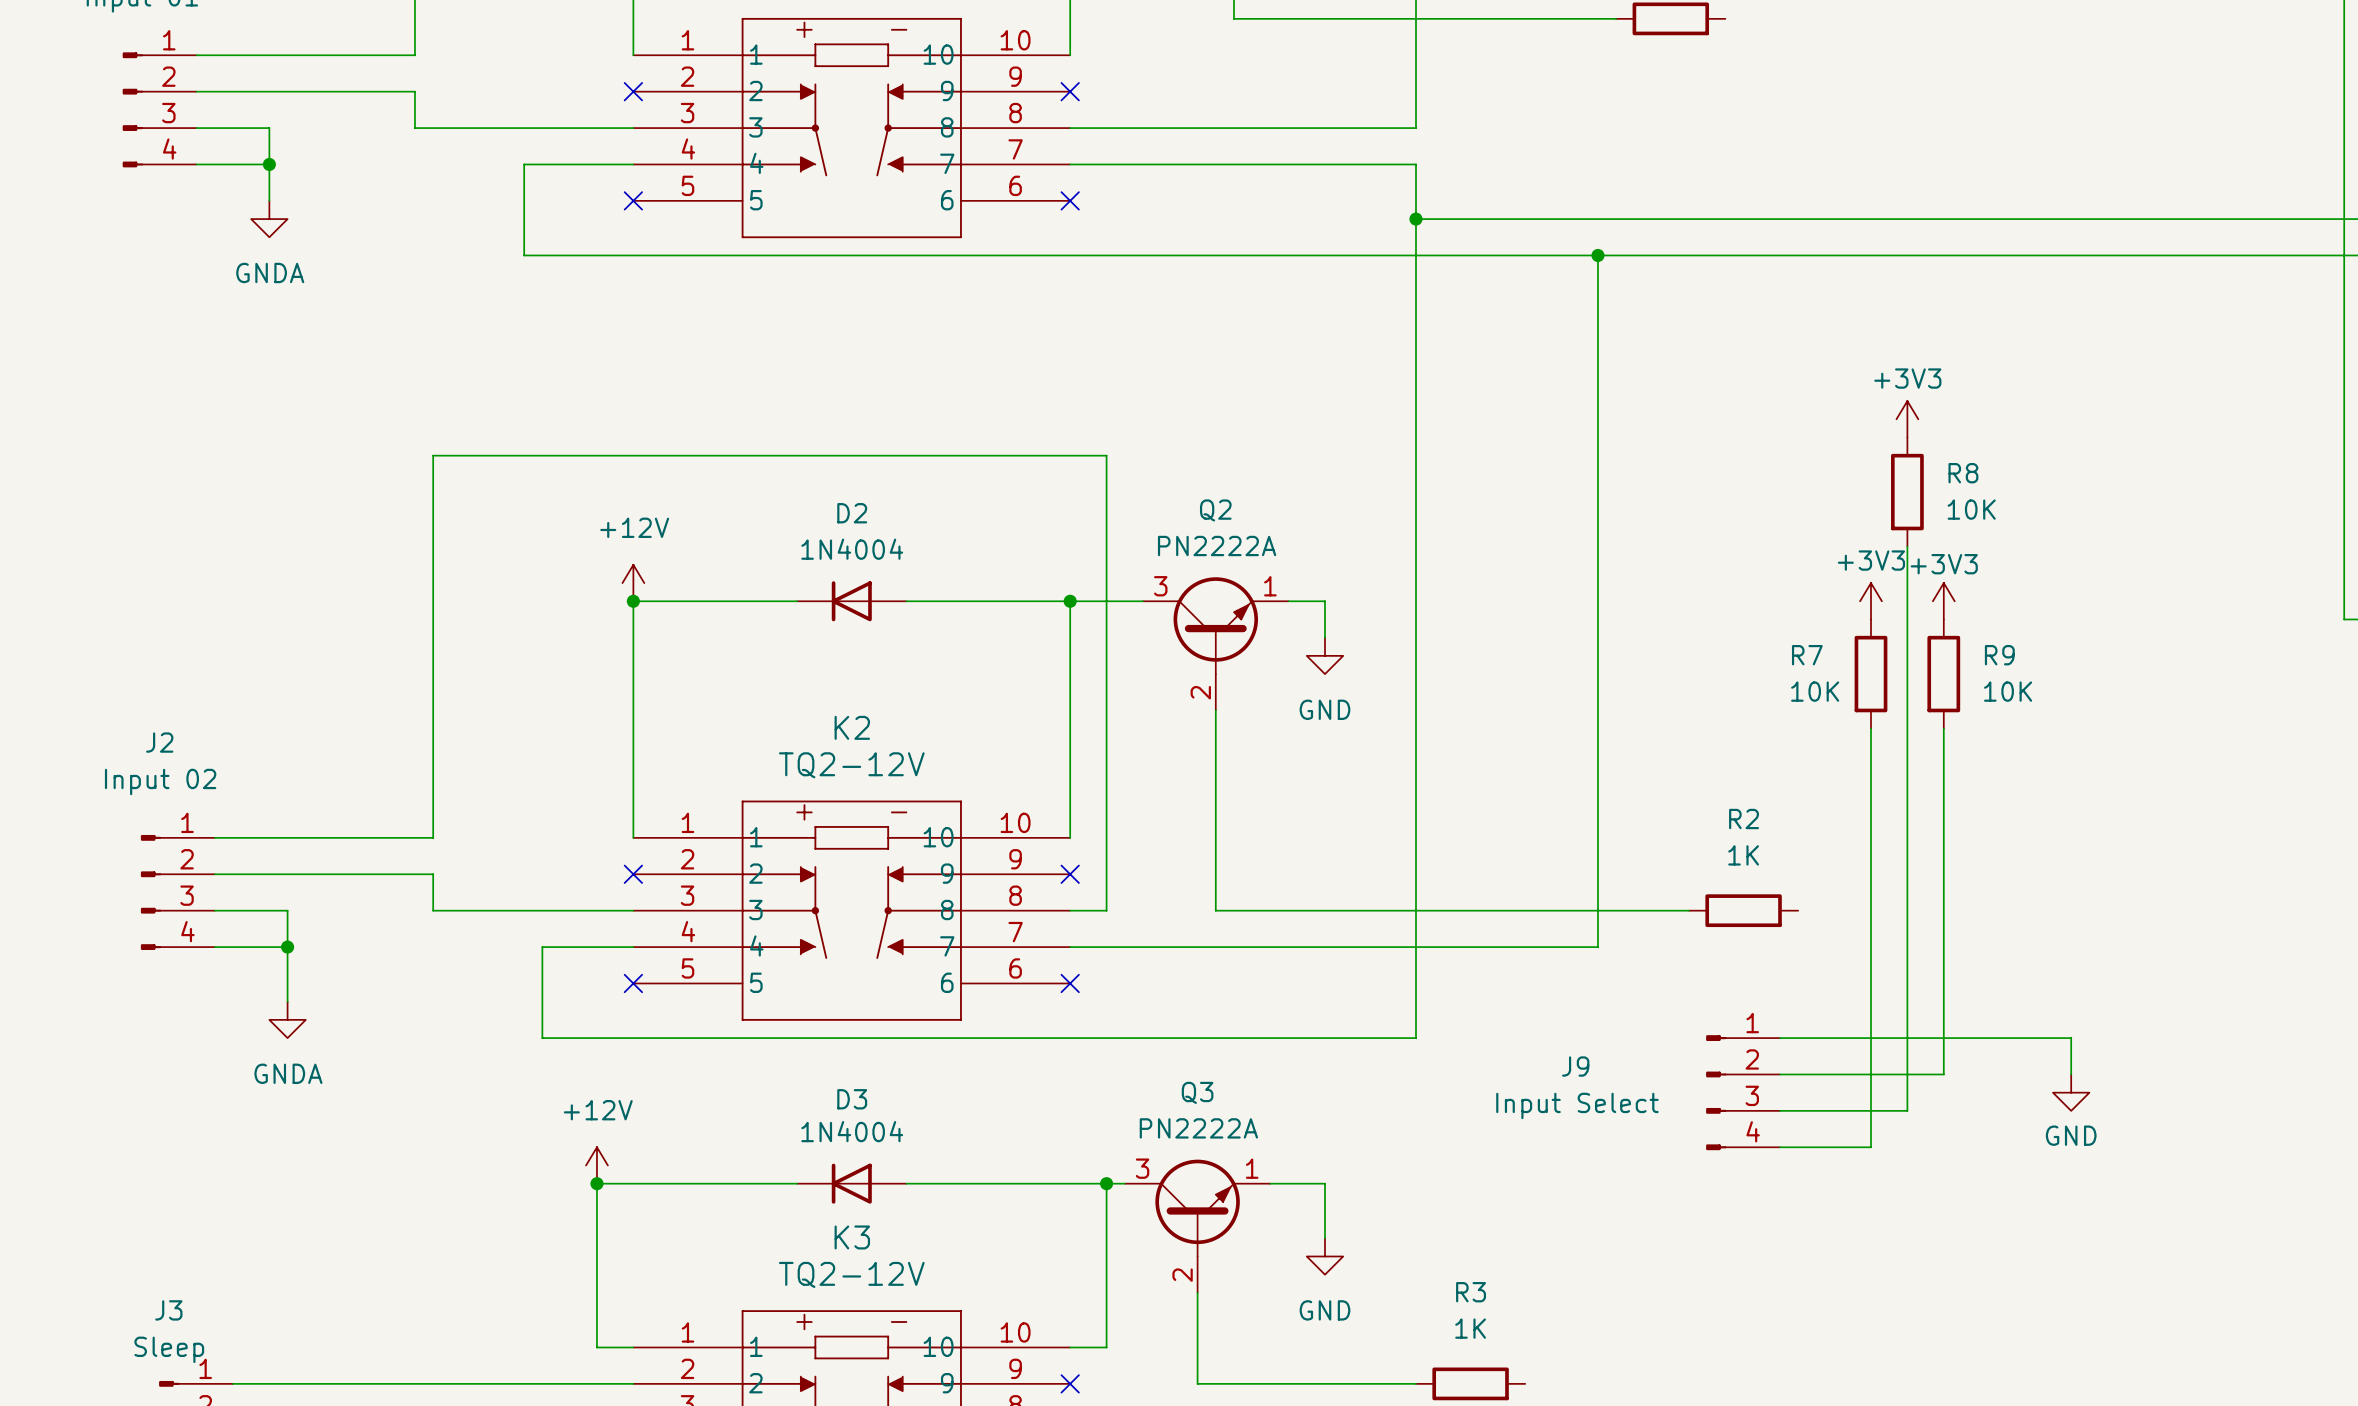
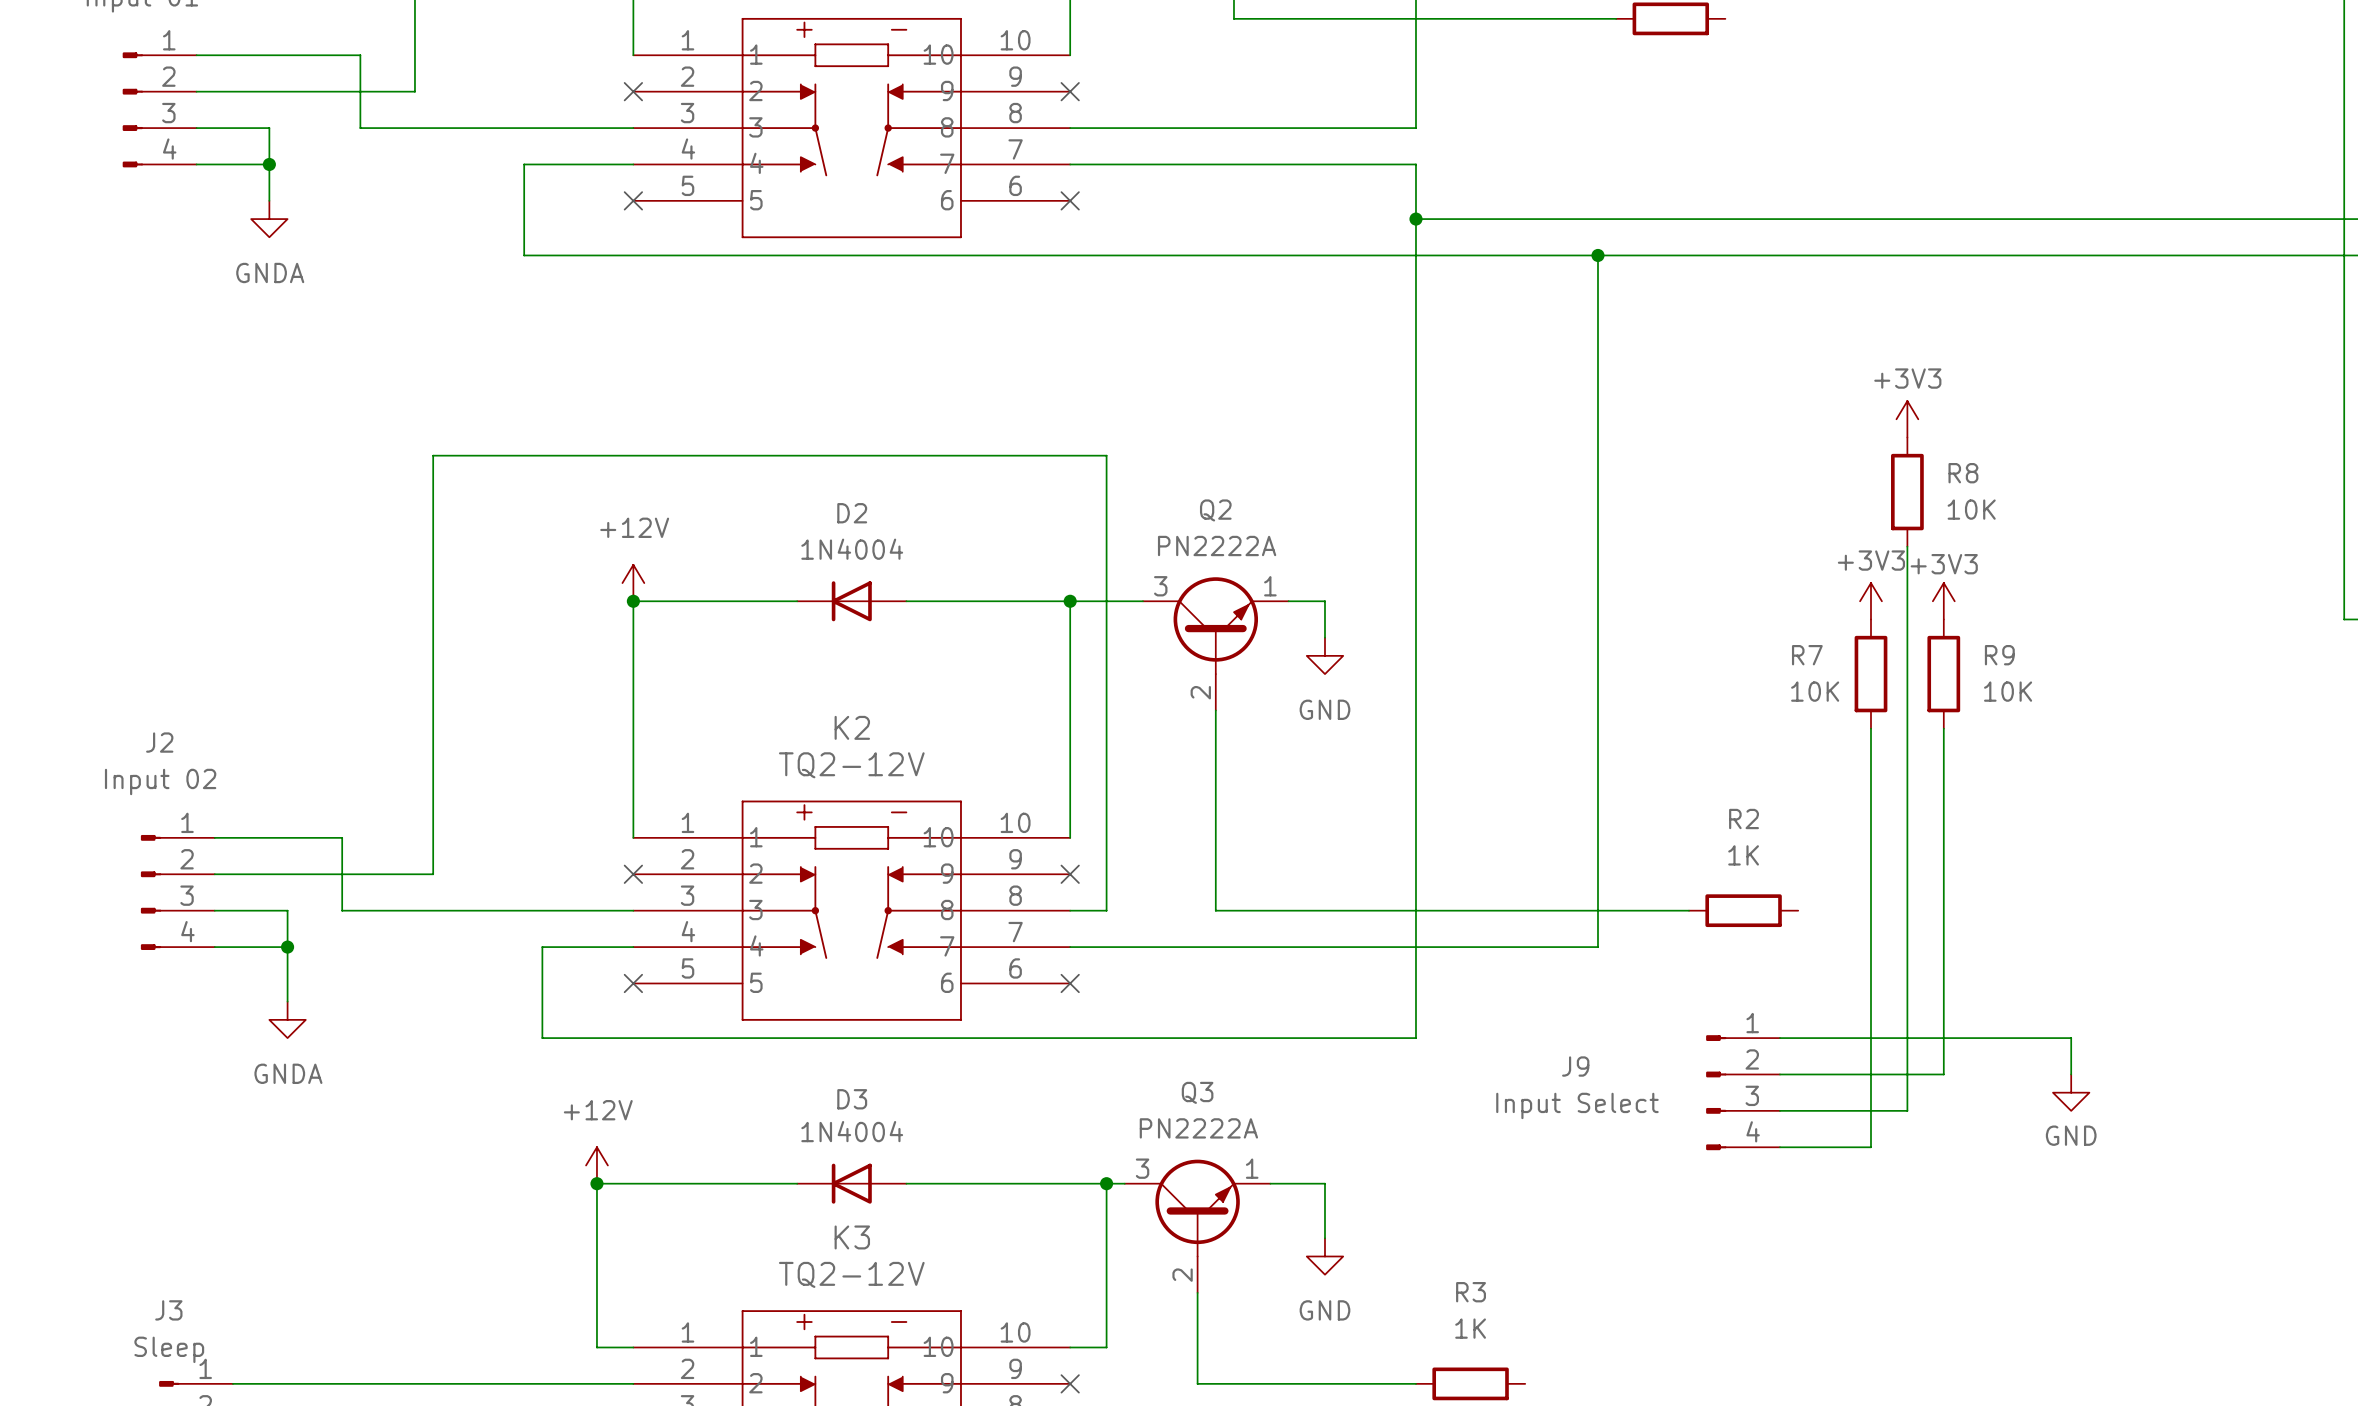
wire: (360, 55) (414, 55) -> (414, 91) (414, 55)
wire: (414, 91) (414, 128) -> (360, 55) (360, 128) (414, 128)
wire: (342, 837) (433, 837) -> (342, 837) (342, 910) (433, 910)
wire: (433, 874) (433, 910) -> (433, 874) (433, 837)

